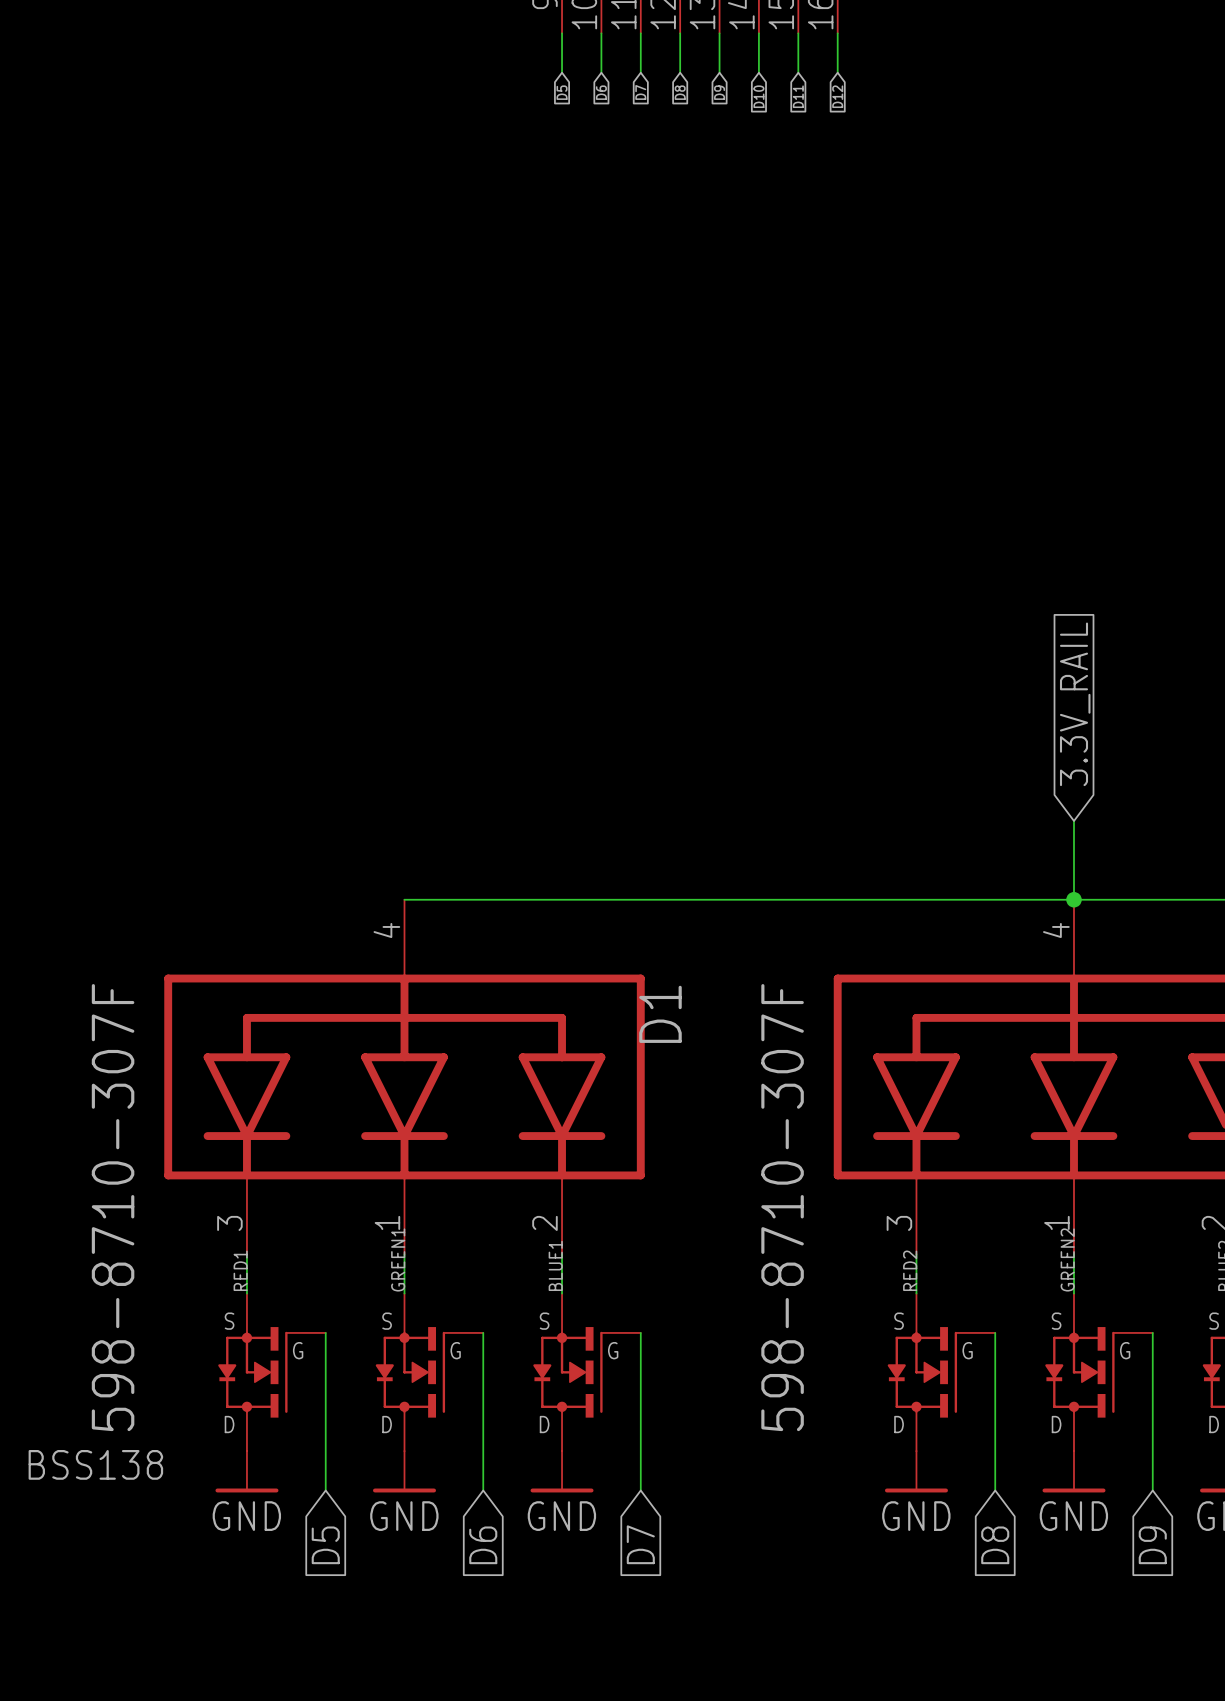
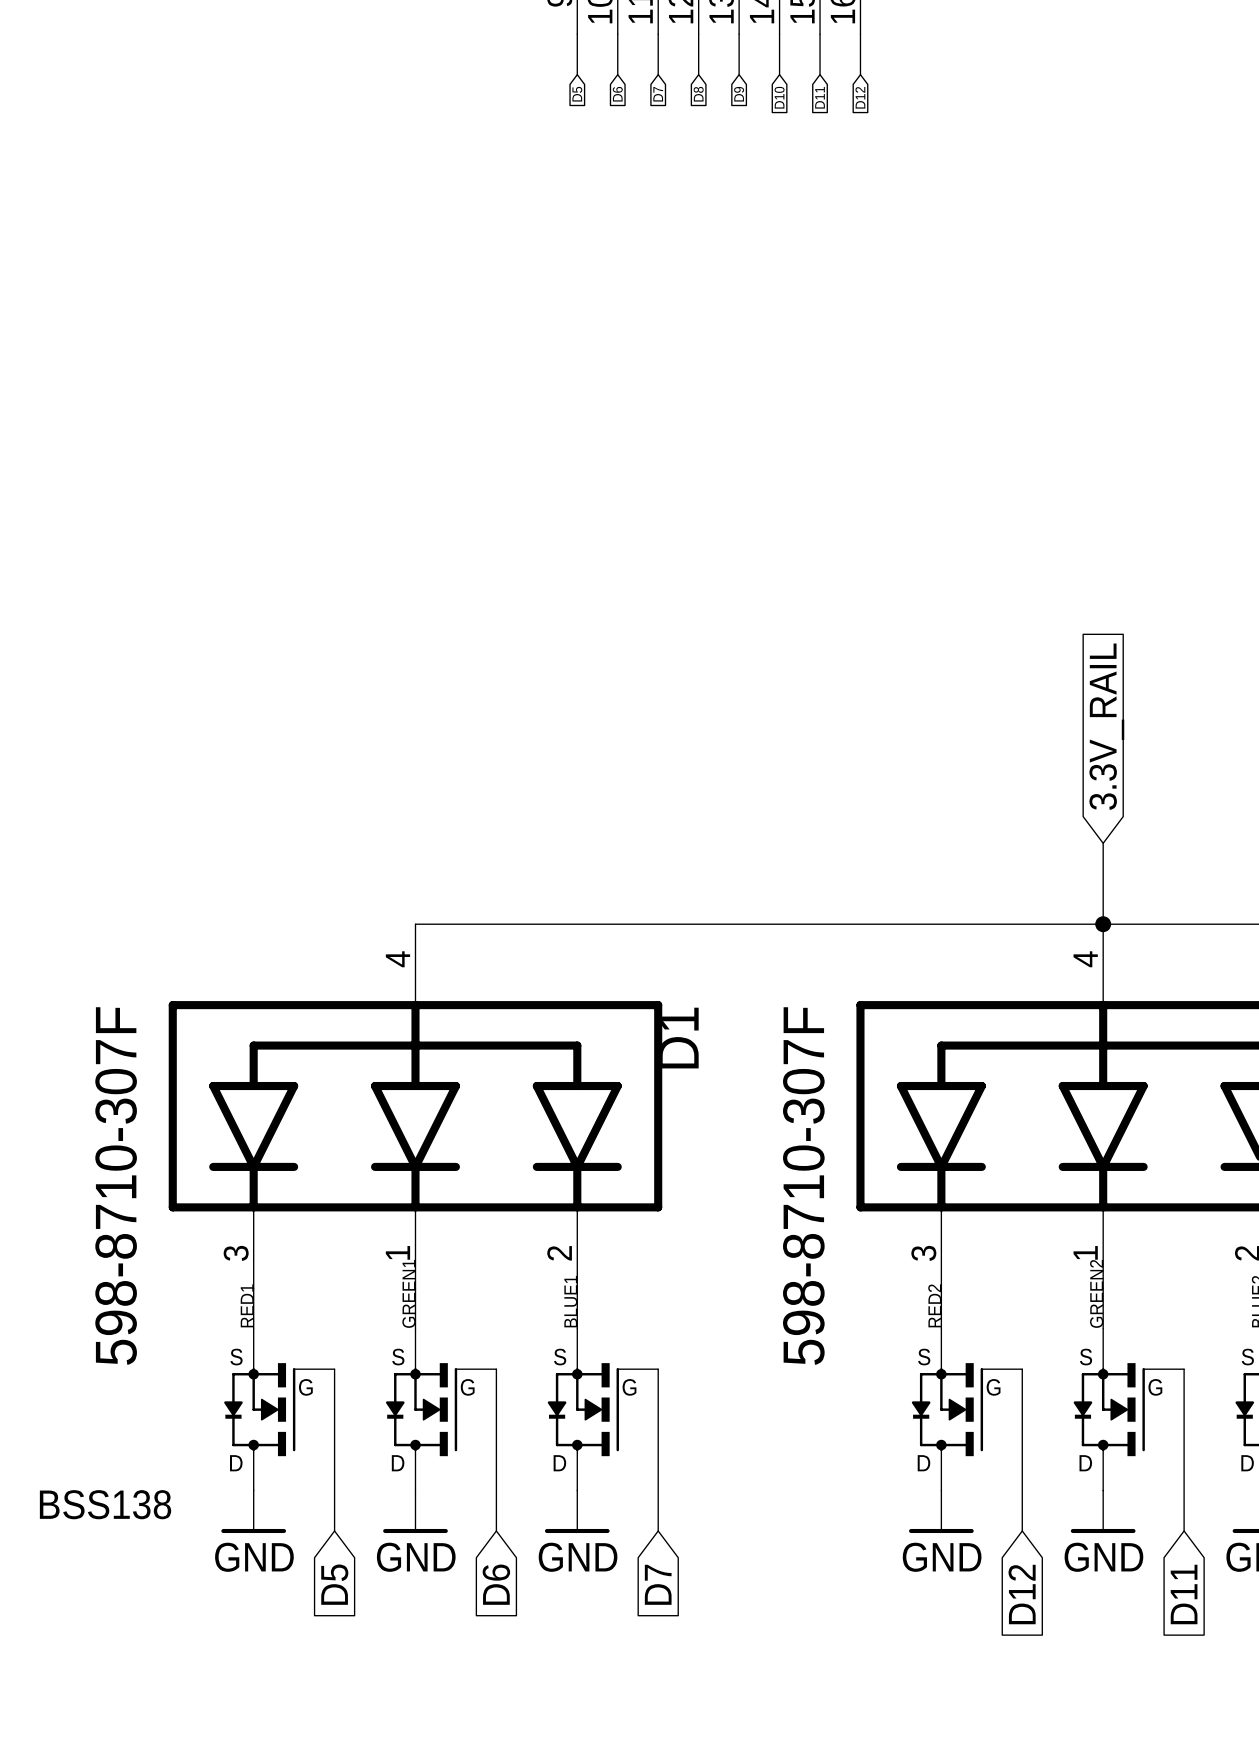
global label: D8 (995, 1545) -> D12 (1022, 1594)
global label: D9 (1152, 1545) -> D11 (1184, 1594)

